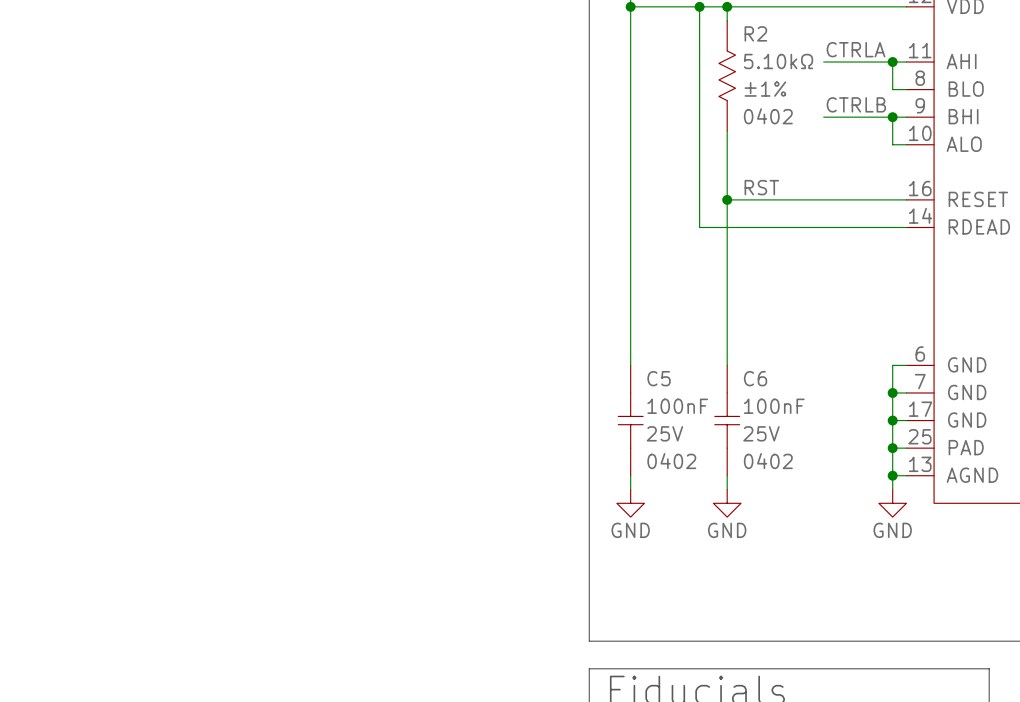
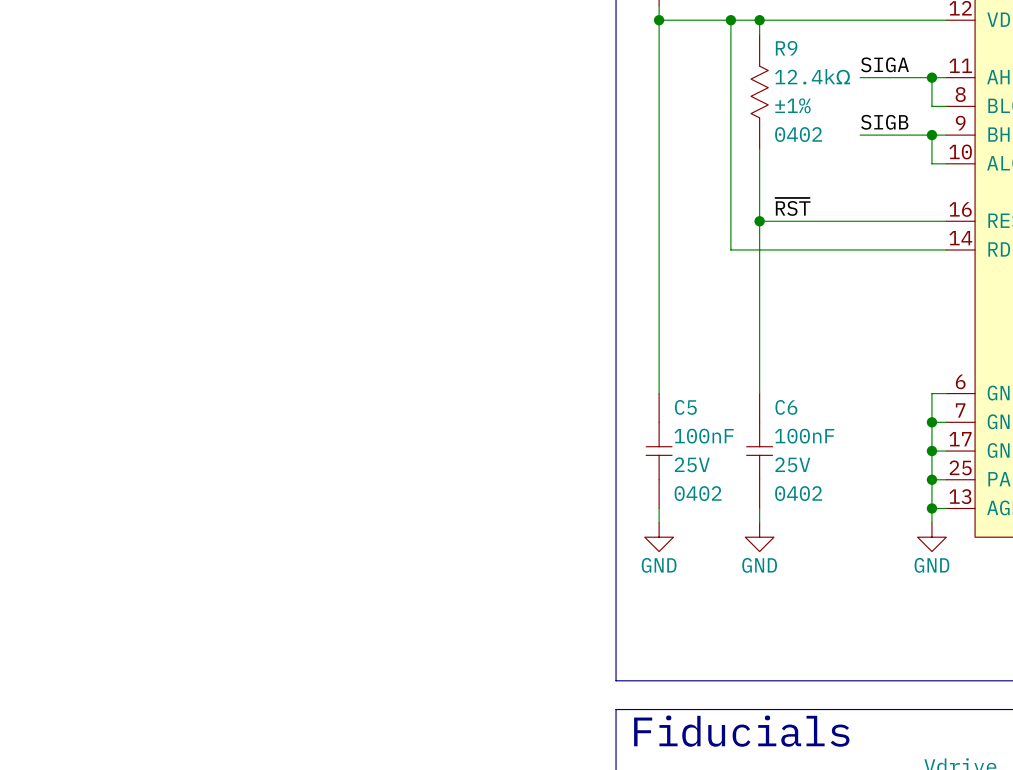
R2 name: R2 (755, 33) -> R9 (786, 48)
label: CTRLA (856, 49) -> SIGA (885, 64)
R2 text: 5.10kΩ (778, 61) -> 12.4kΩ (812, 76)
label: CTRLB (856, 104) -> SIGB (884, 122)
label: RST (761, 187) -> ~{RST} (792, 206)

